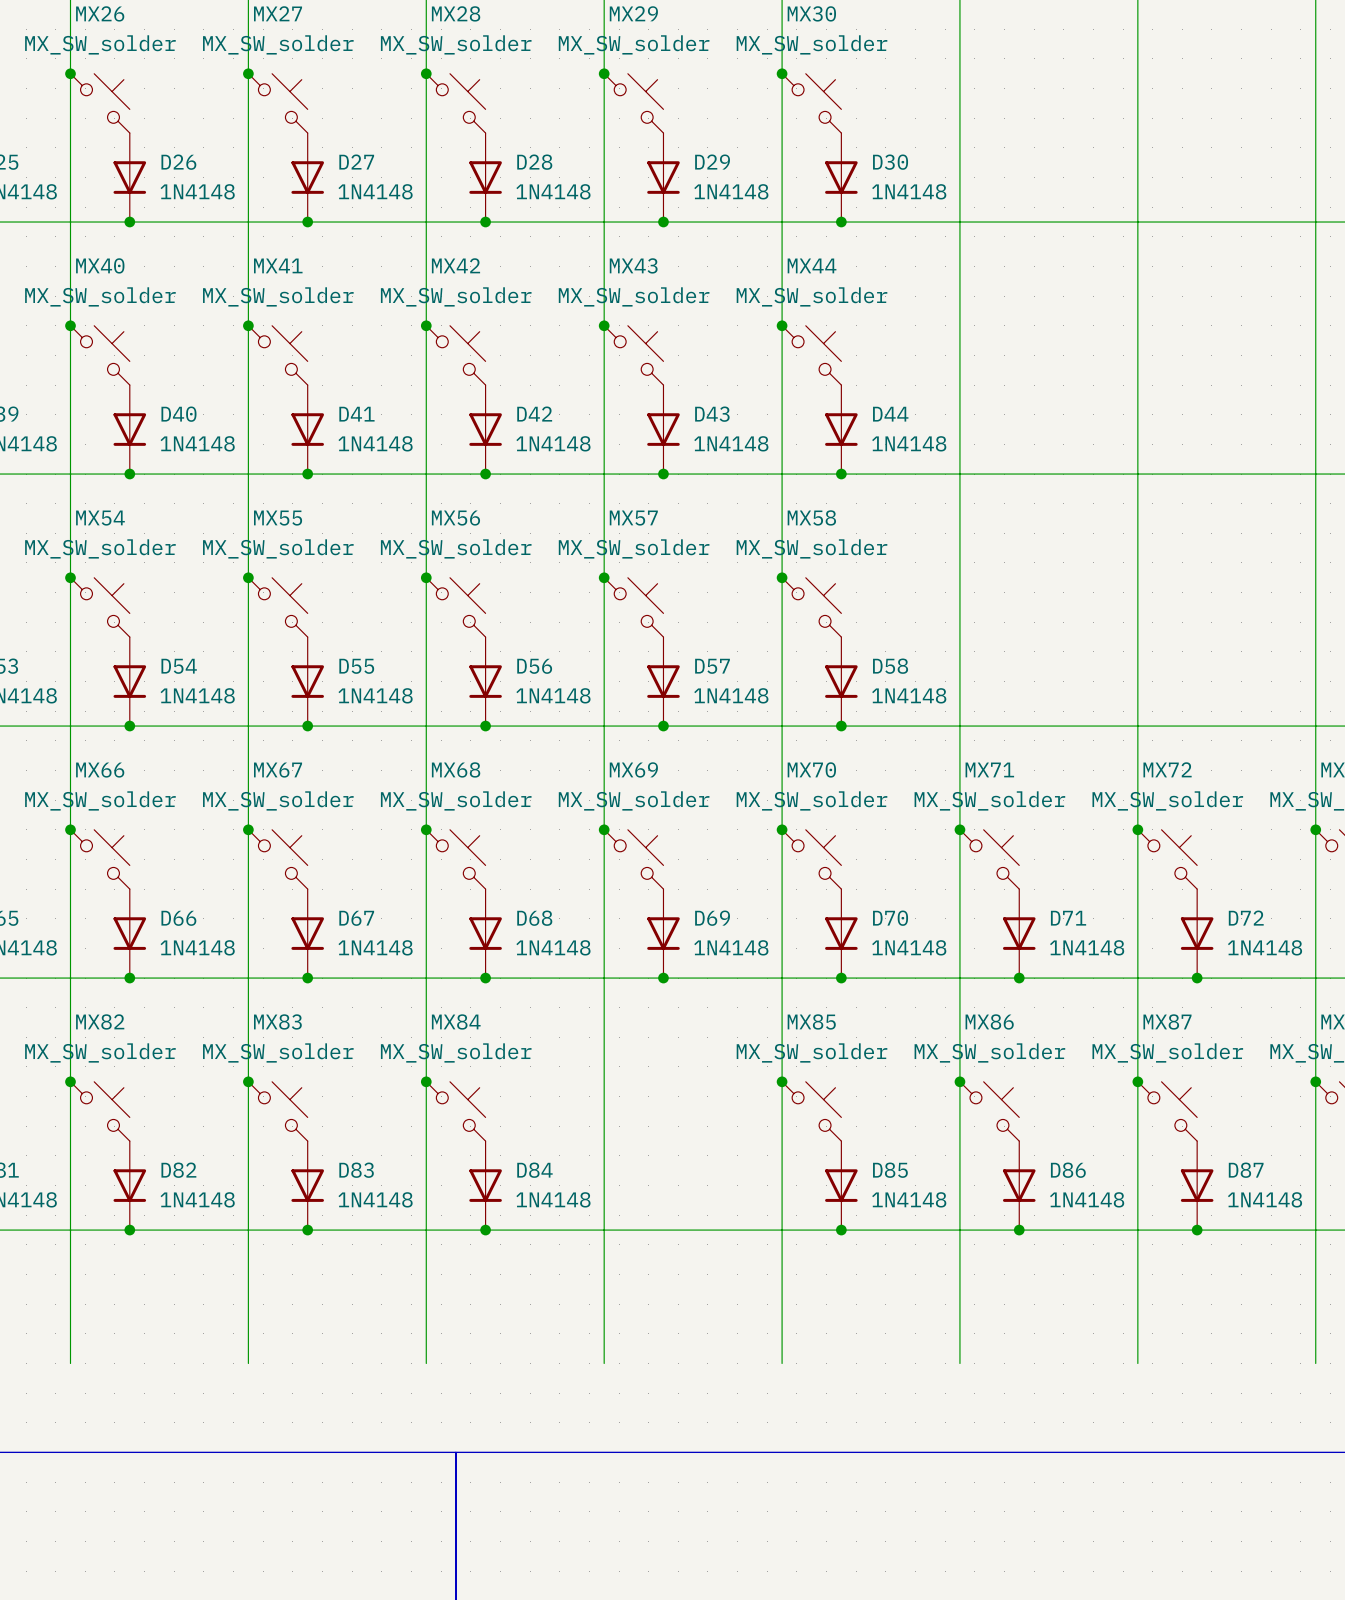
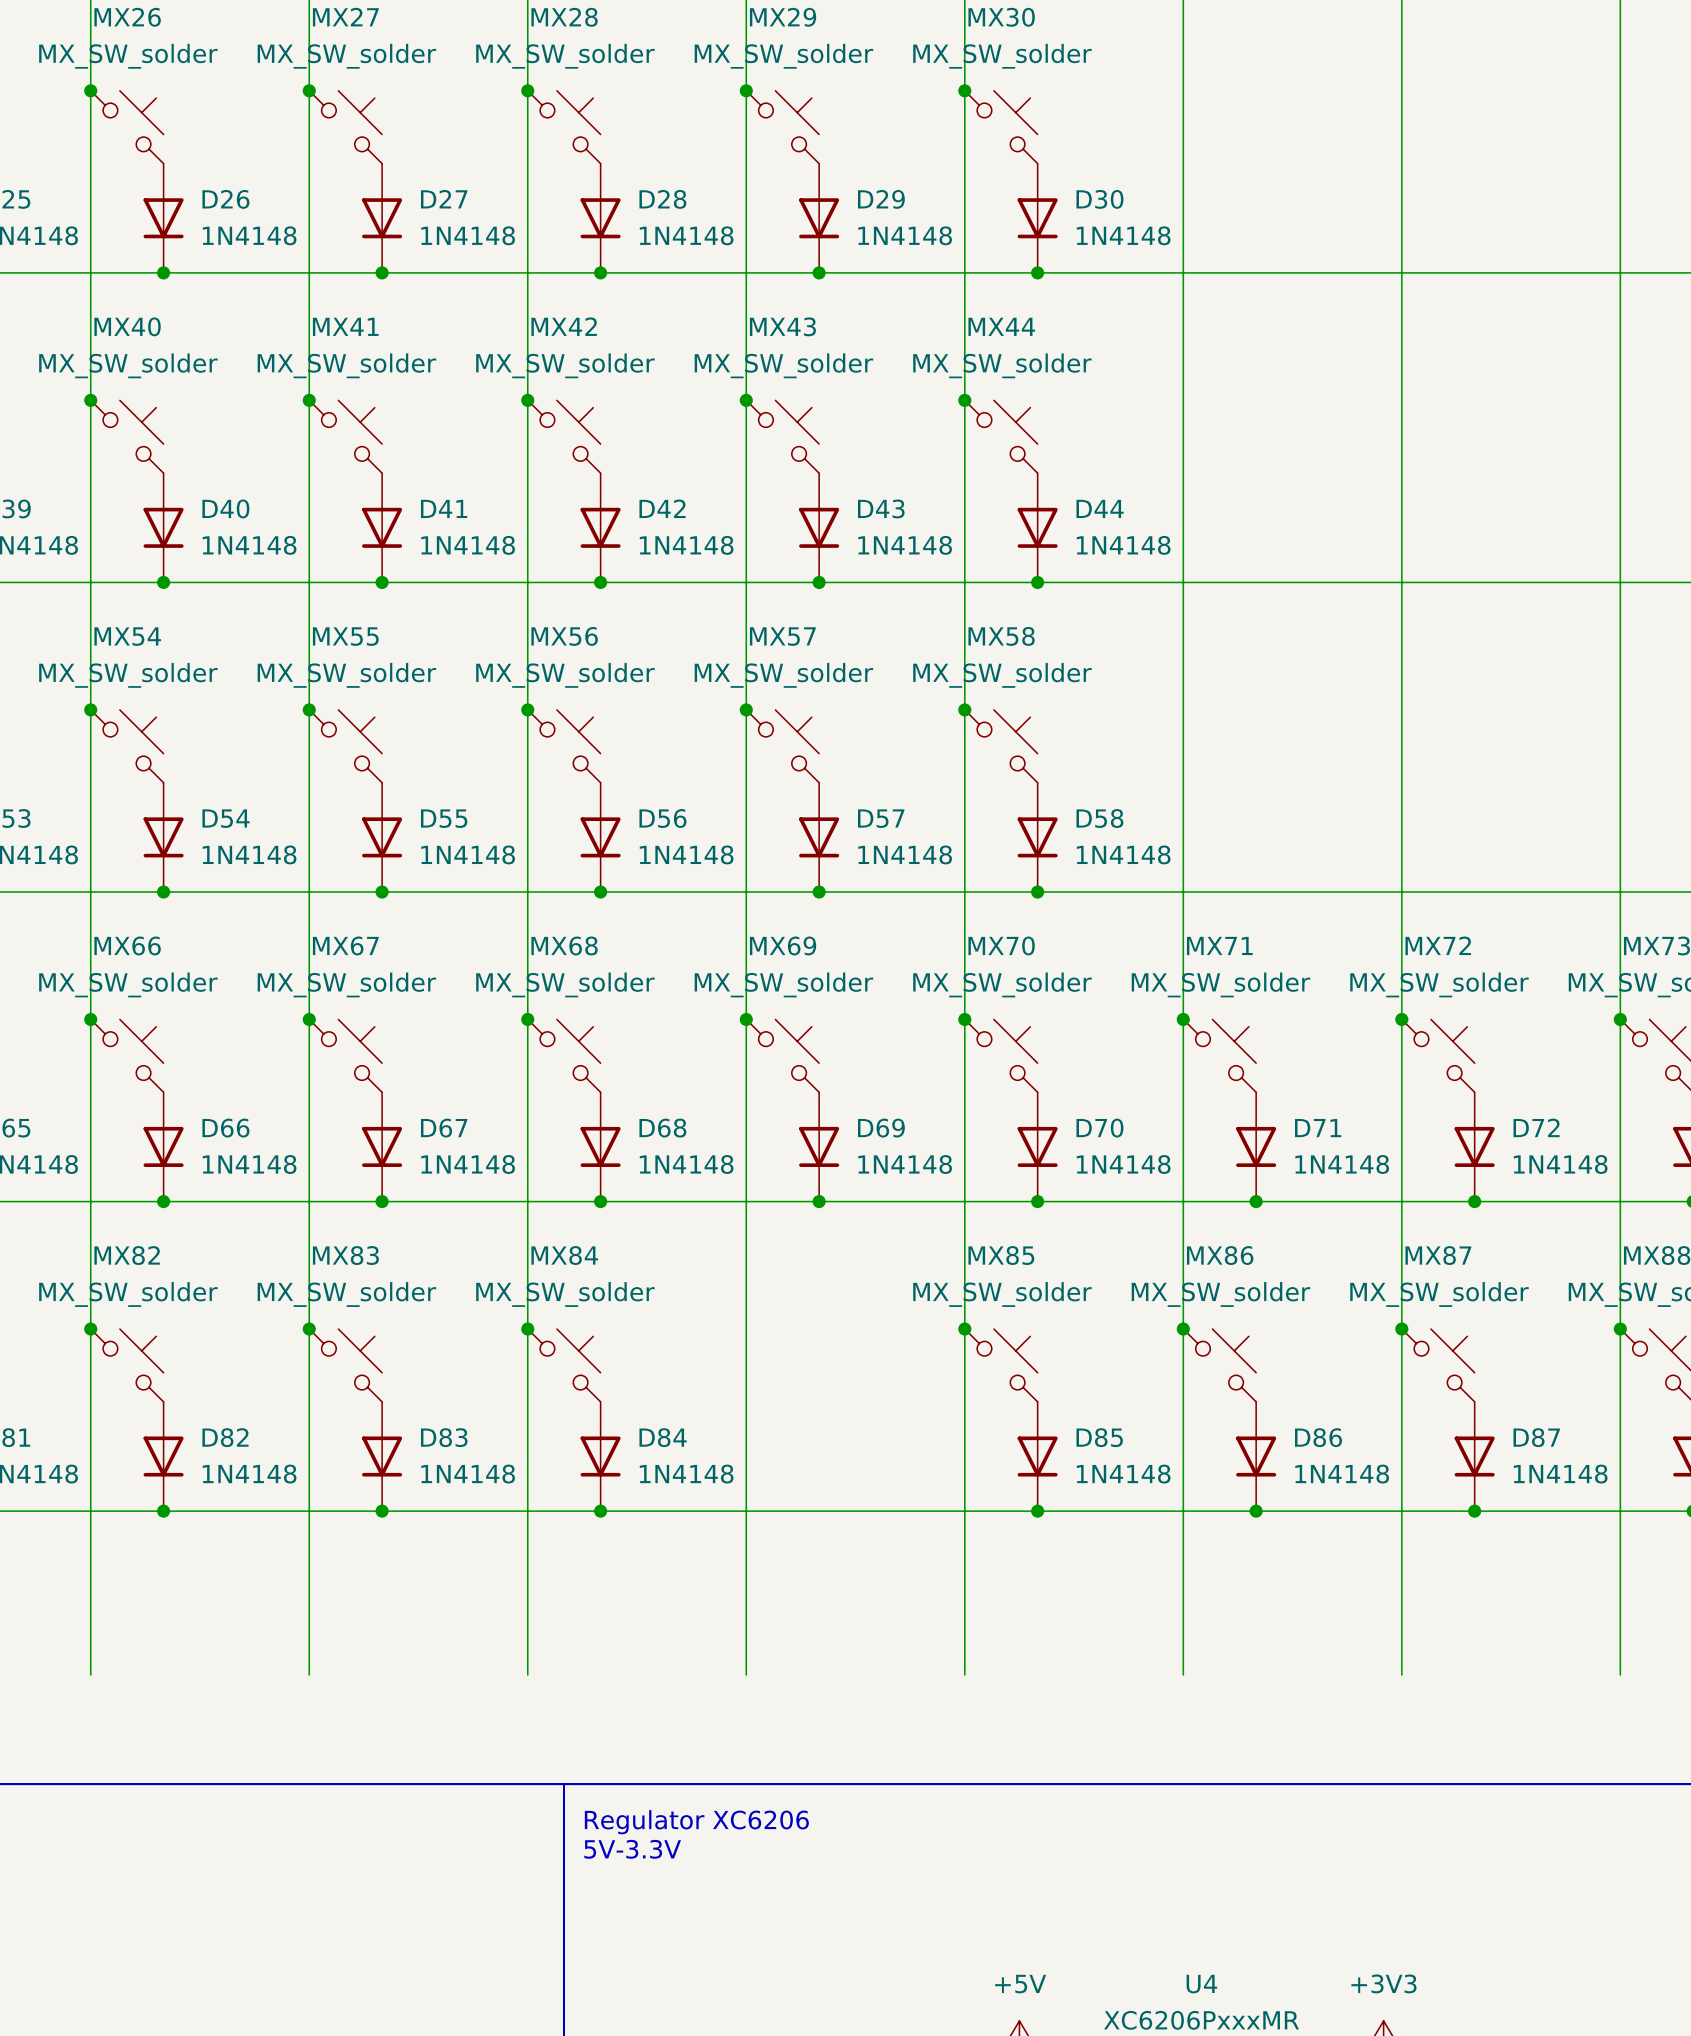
text: none -> Regulator XC6206 (696, 1822)
text: none -> 5V-3.3V (632, 1849)

